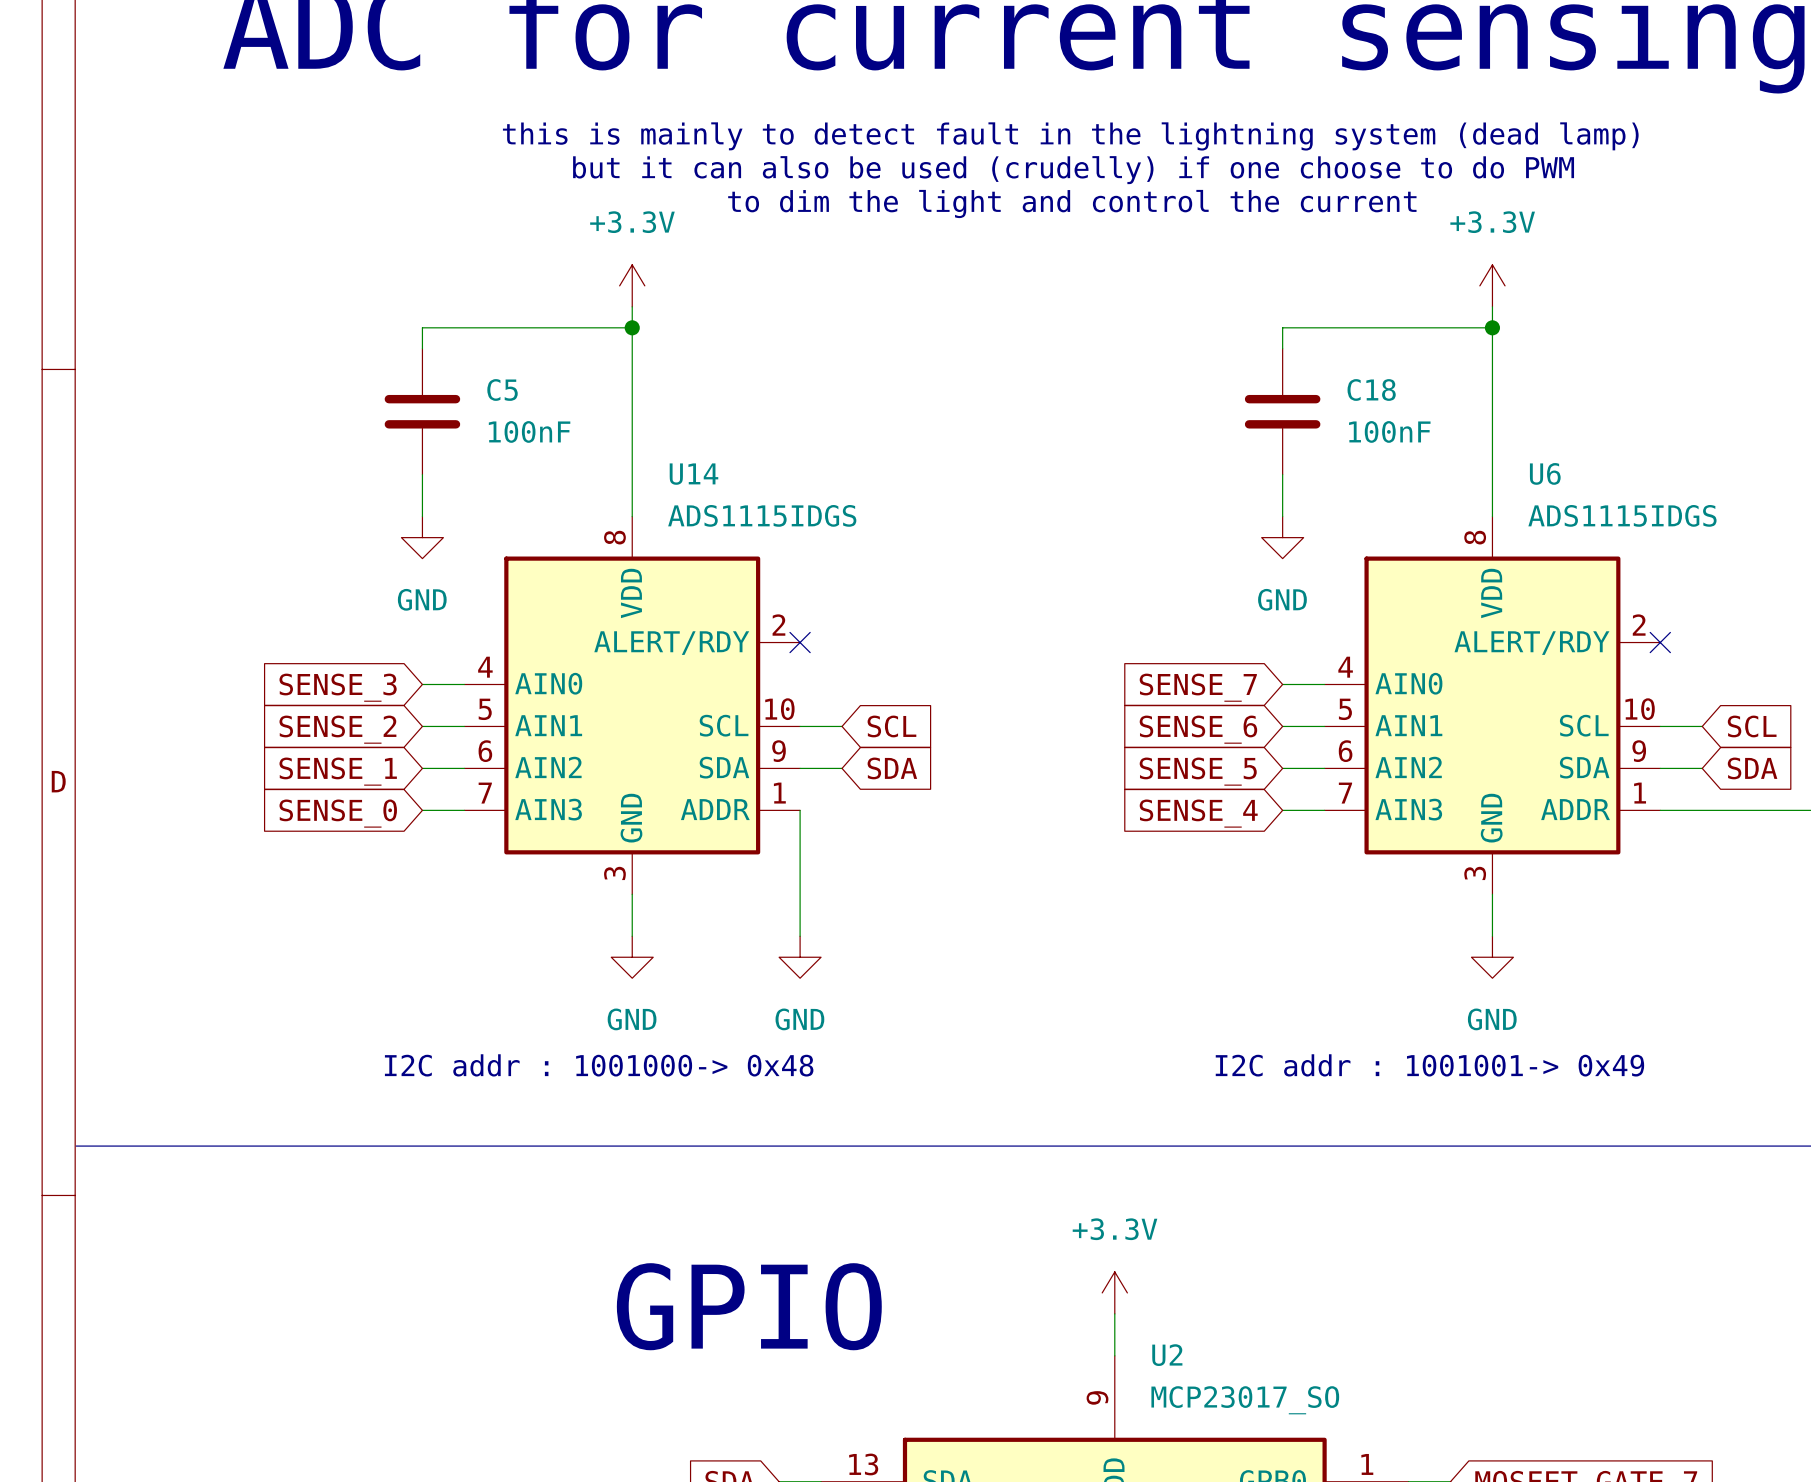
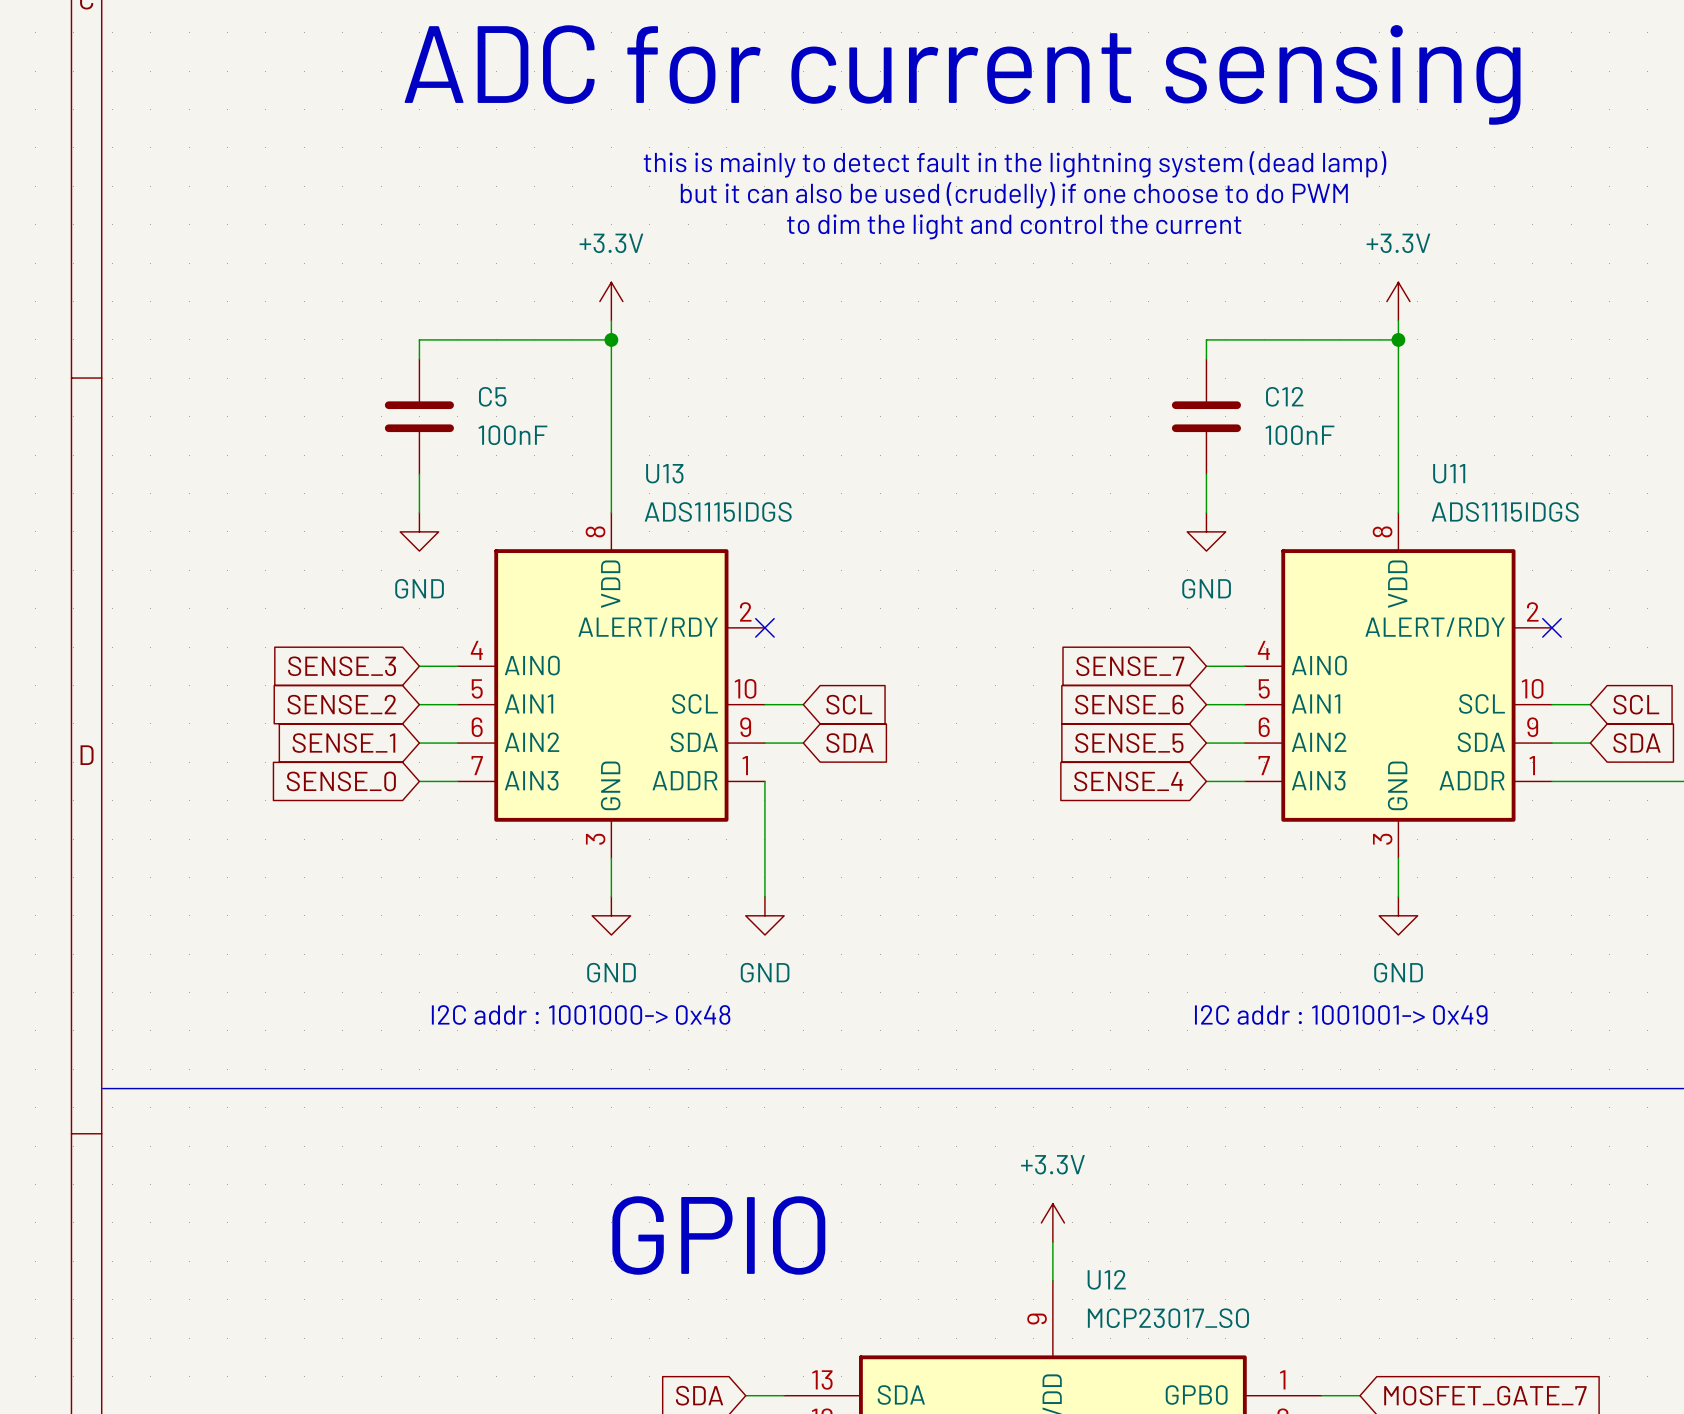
C18 name: C18 (1371, 389) -> C12 (1284, 396)
U6 name: U6 (1545, 473) -> U11 (1449, 473)
U14 name: U14 (693, 474) -> U13 (664, 473)
U2 name: U2 (1167, 1355) -> U12 (1106, 1279)

